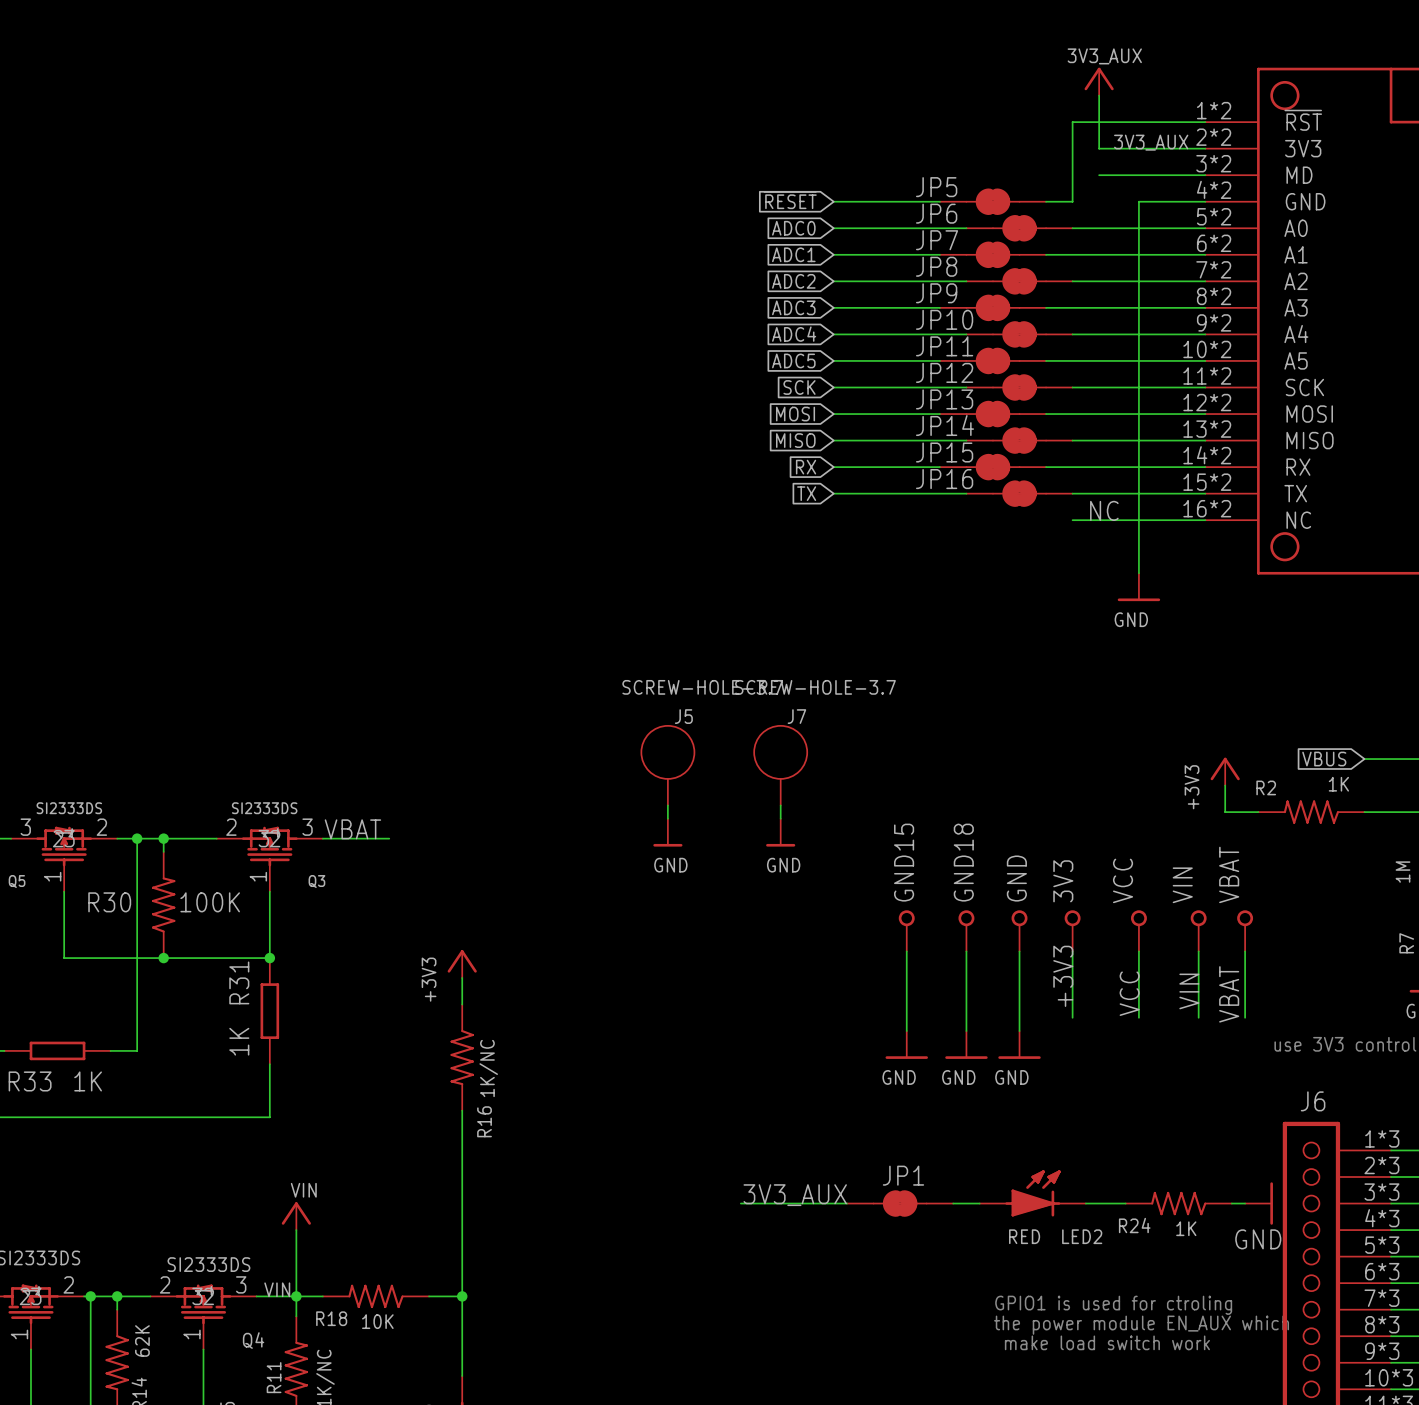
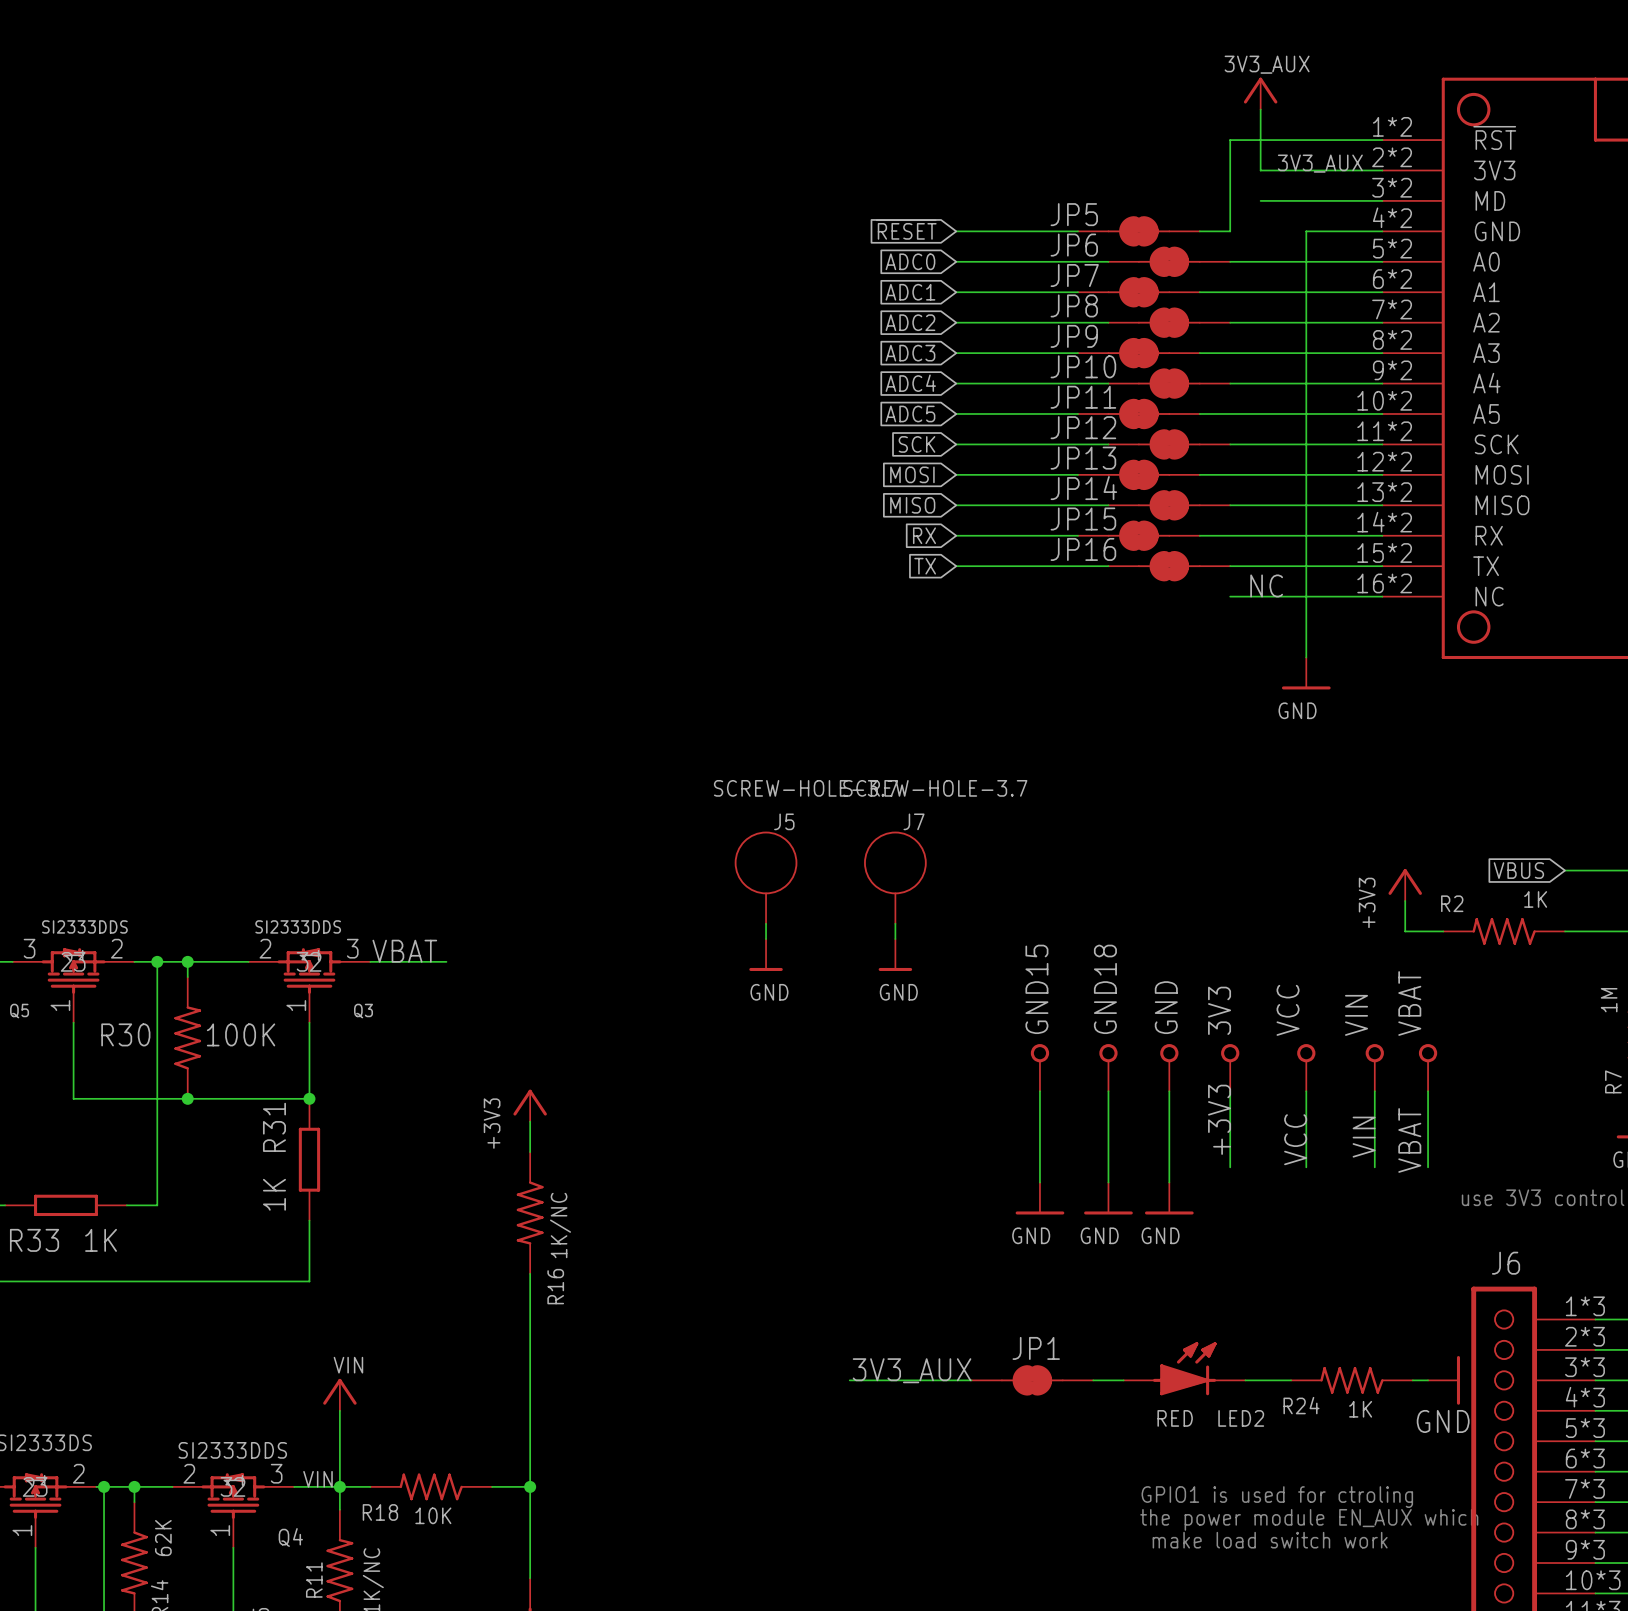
Q5 value: SI2333DS (69, 808) -> SI2333DDS (84, 926)
Q3 value: SI2333DS (264, 808) -> SI2333DDS (298, 926)
Q4 value: SI2333DS (208, 1264) -> SI2333DDS (232, 1450)

